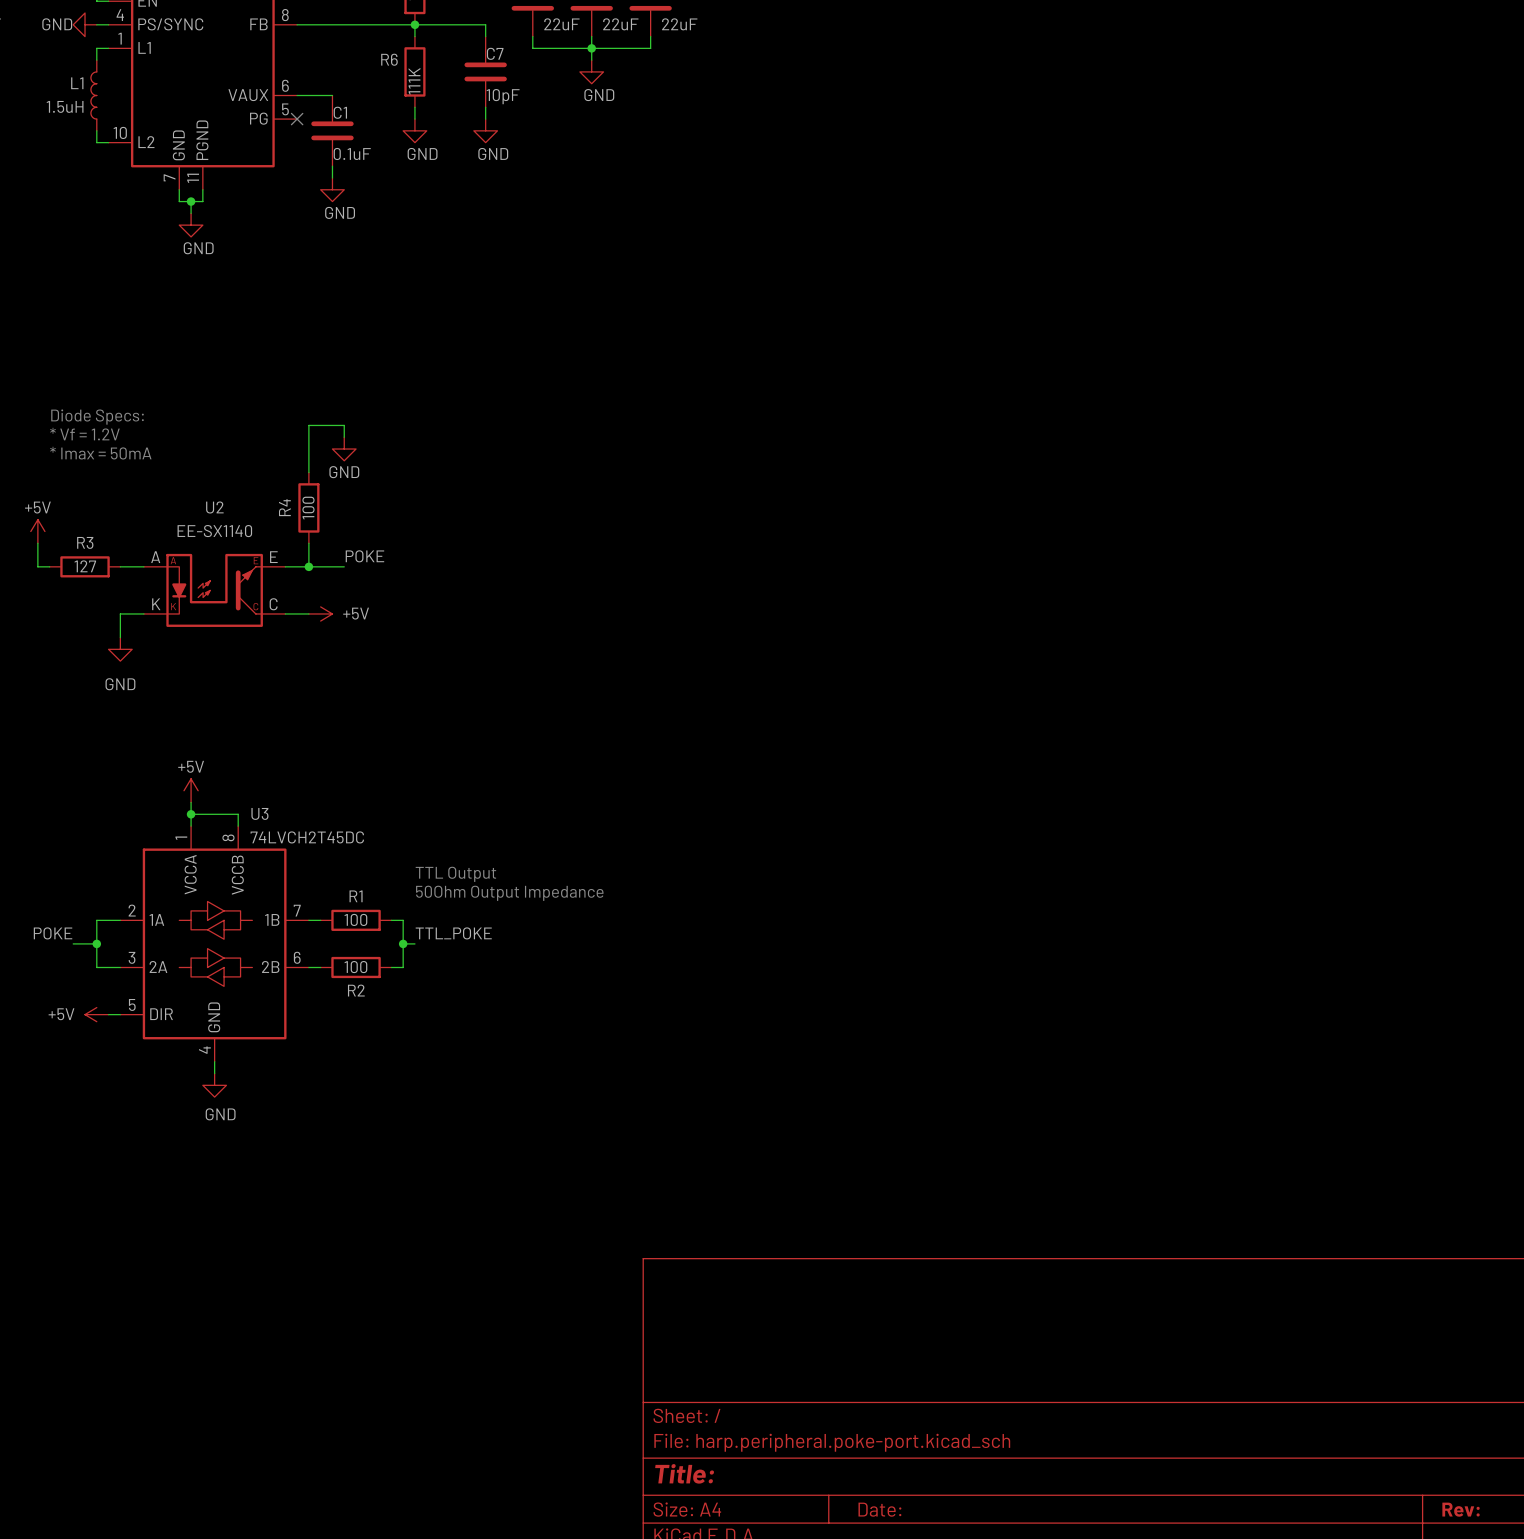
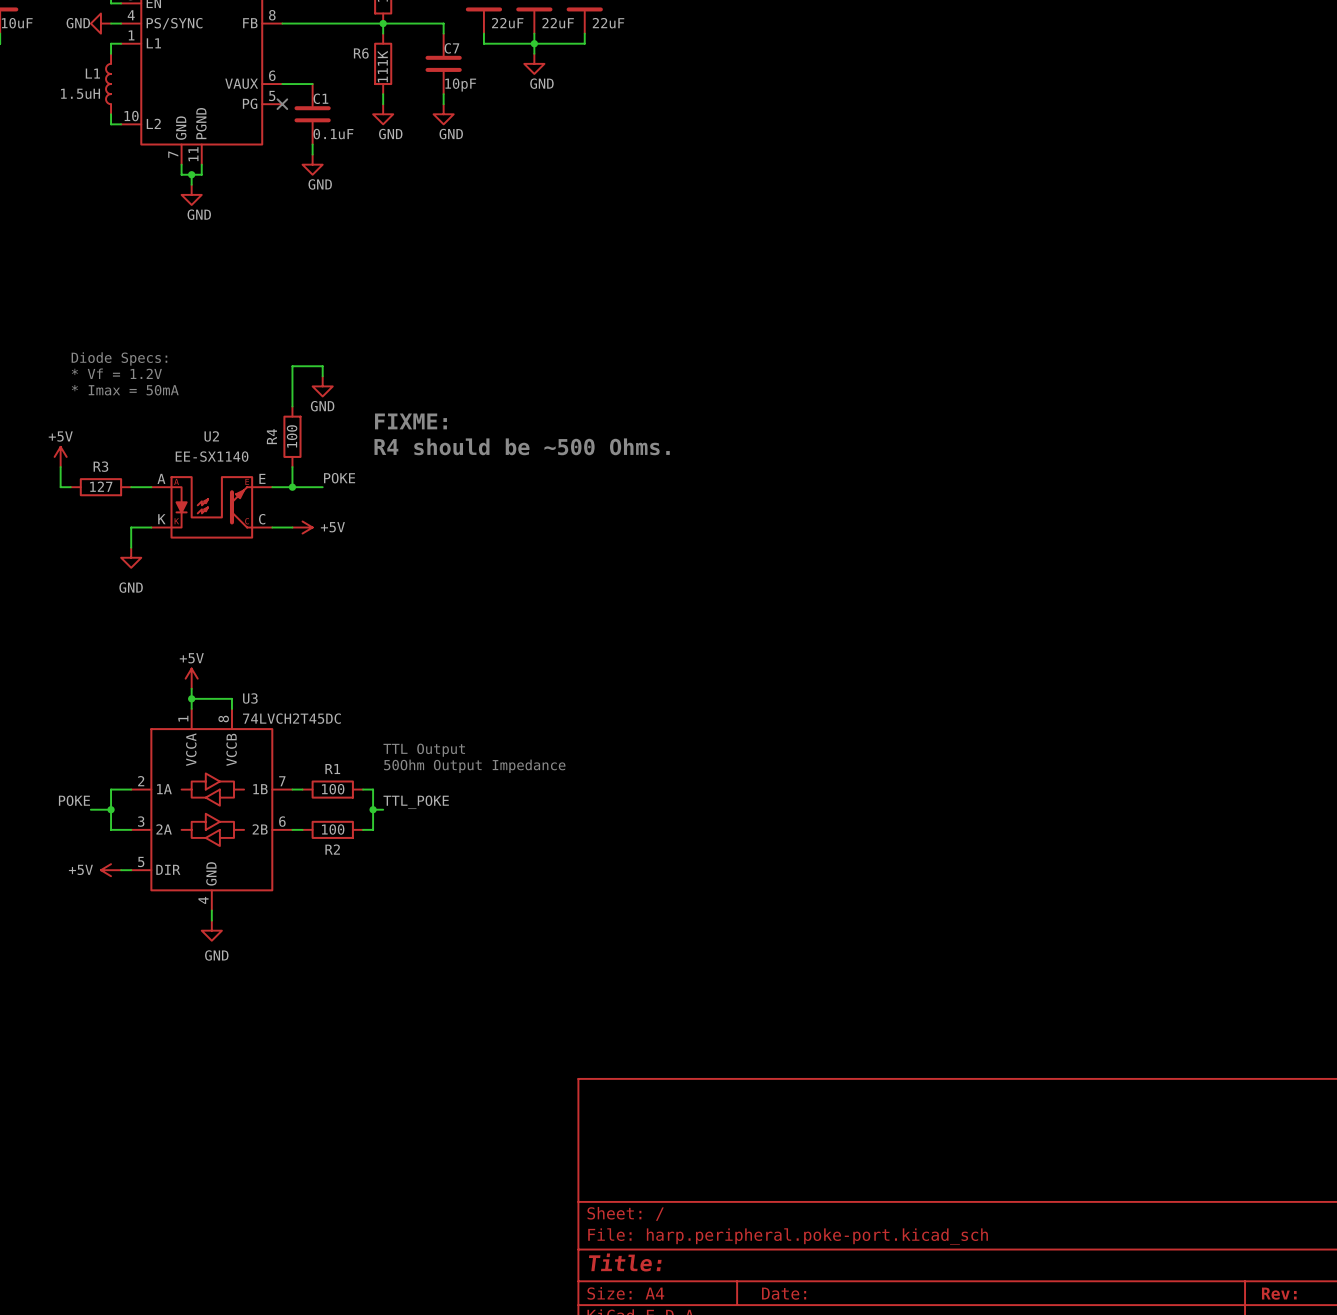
text: none -> FIXME: (410, 421)
text: none -> R4 should be ~500 Ohms. (522, 446)

